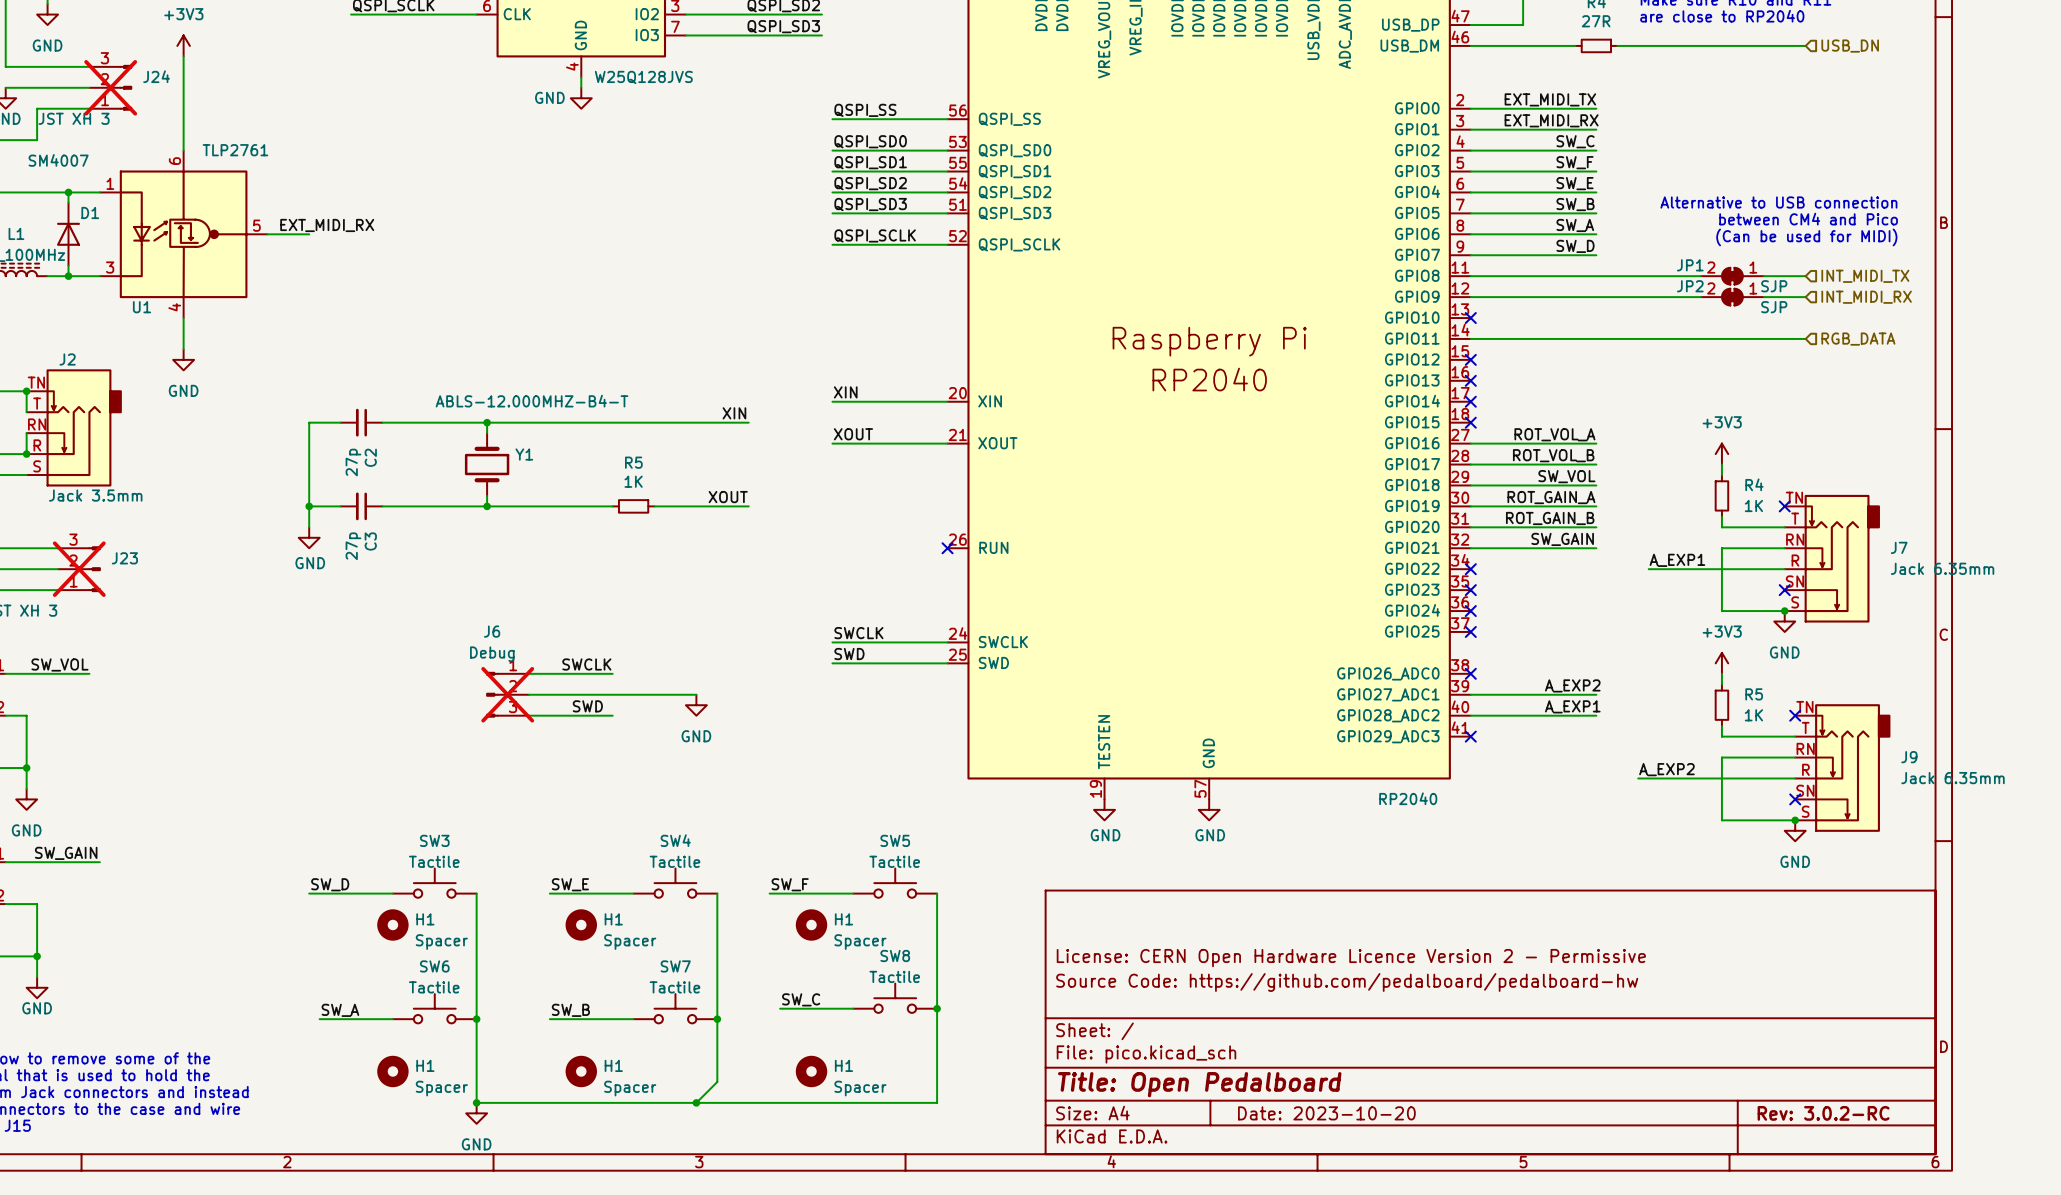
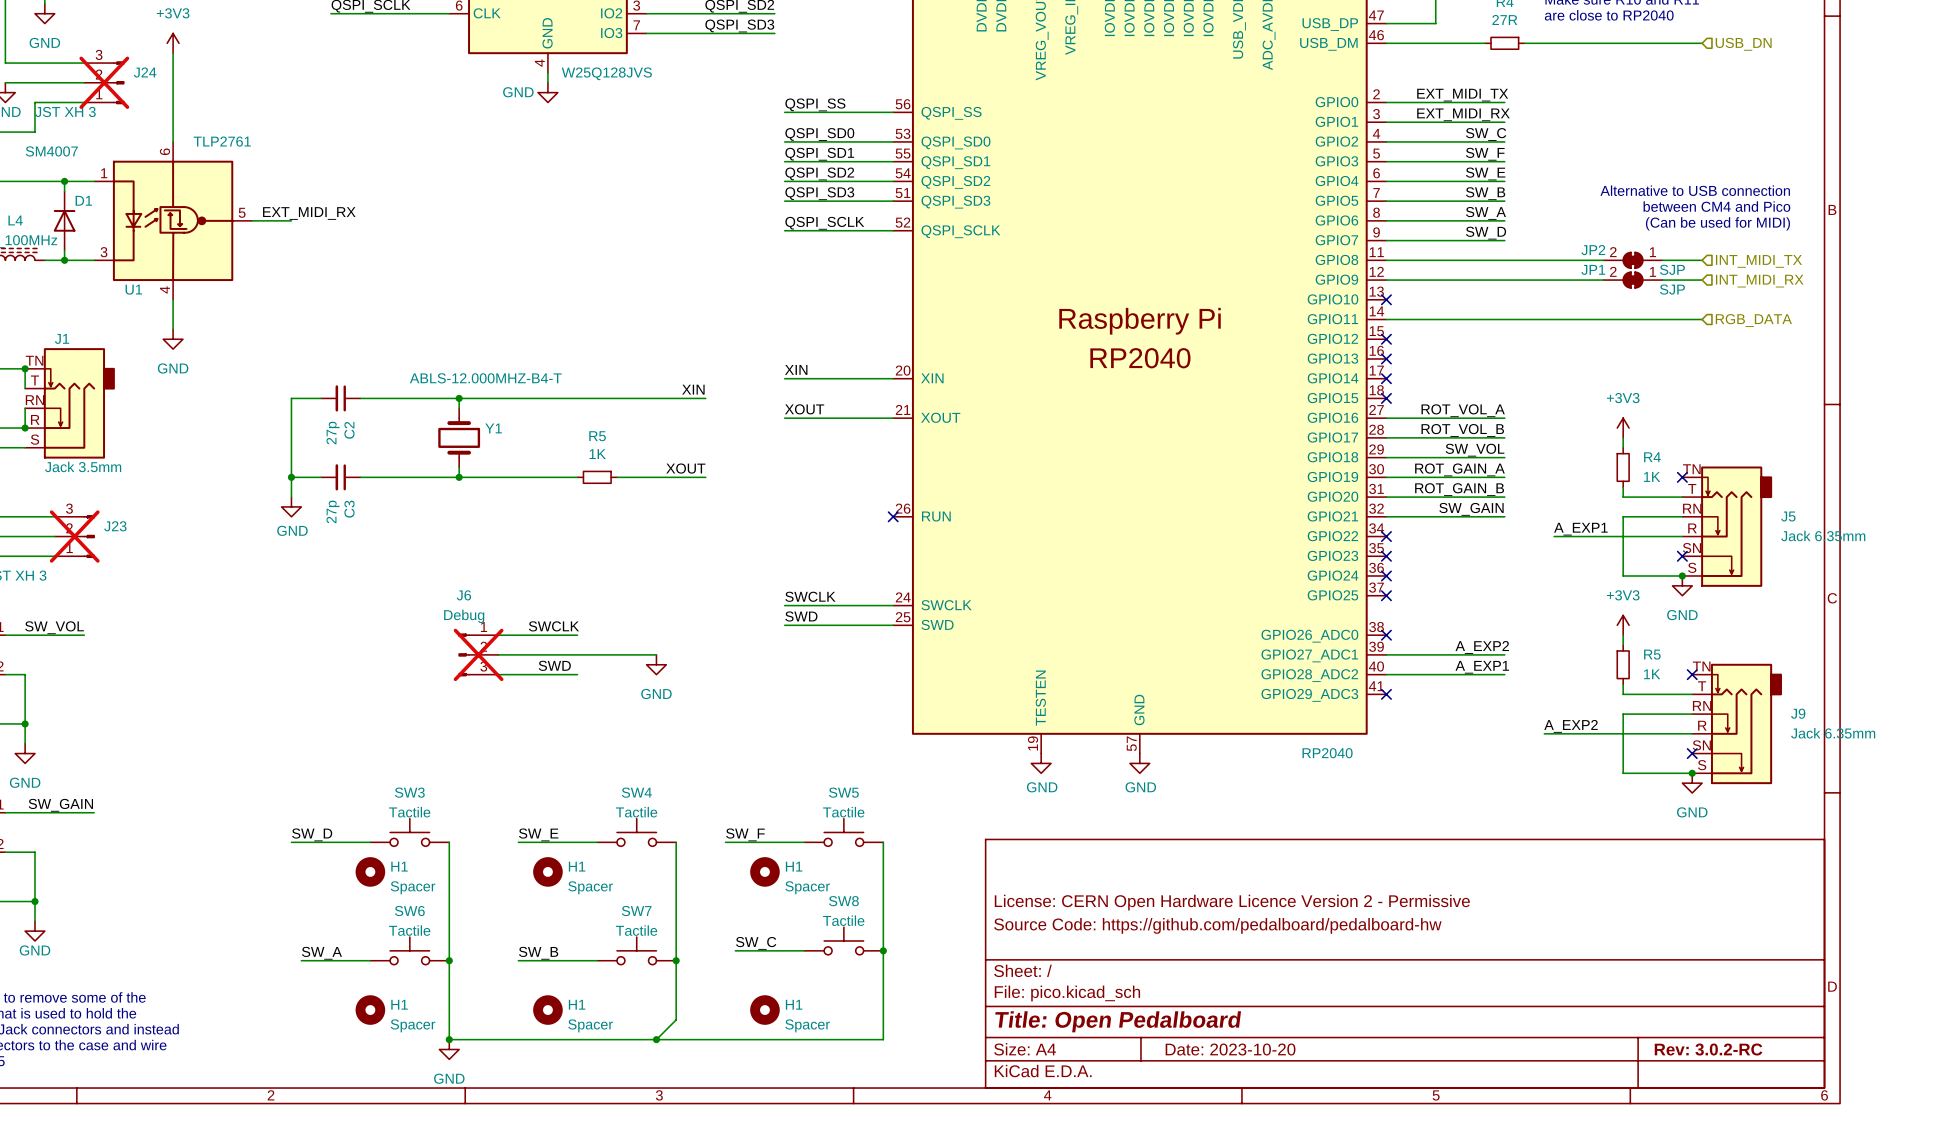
L1 name: L1 (16, 233) -> L4 (15, 220)
JP1 name: JP1 (1690, 265) -> JP2 (1593, 250)
JP2 name: JP2 (1690, 286) -> JP1 (1593, 269)
J2 name: J2 (67, 359) -> J1 (62, 338)
J7 name: J7 (1899, 547) -> J5 (1788, 516)

